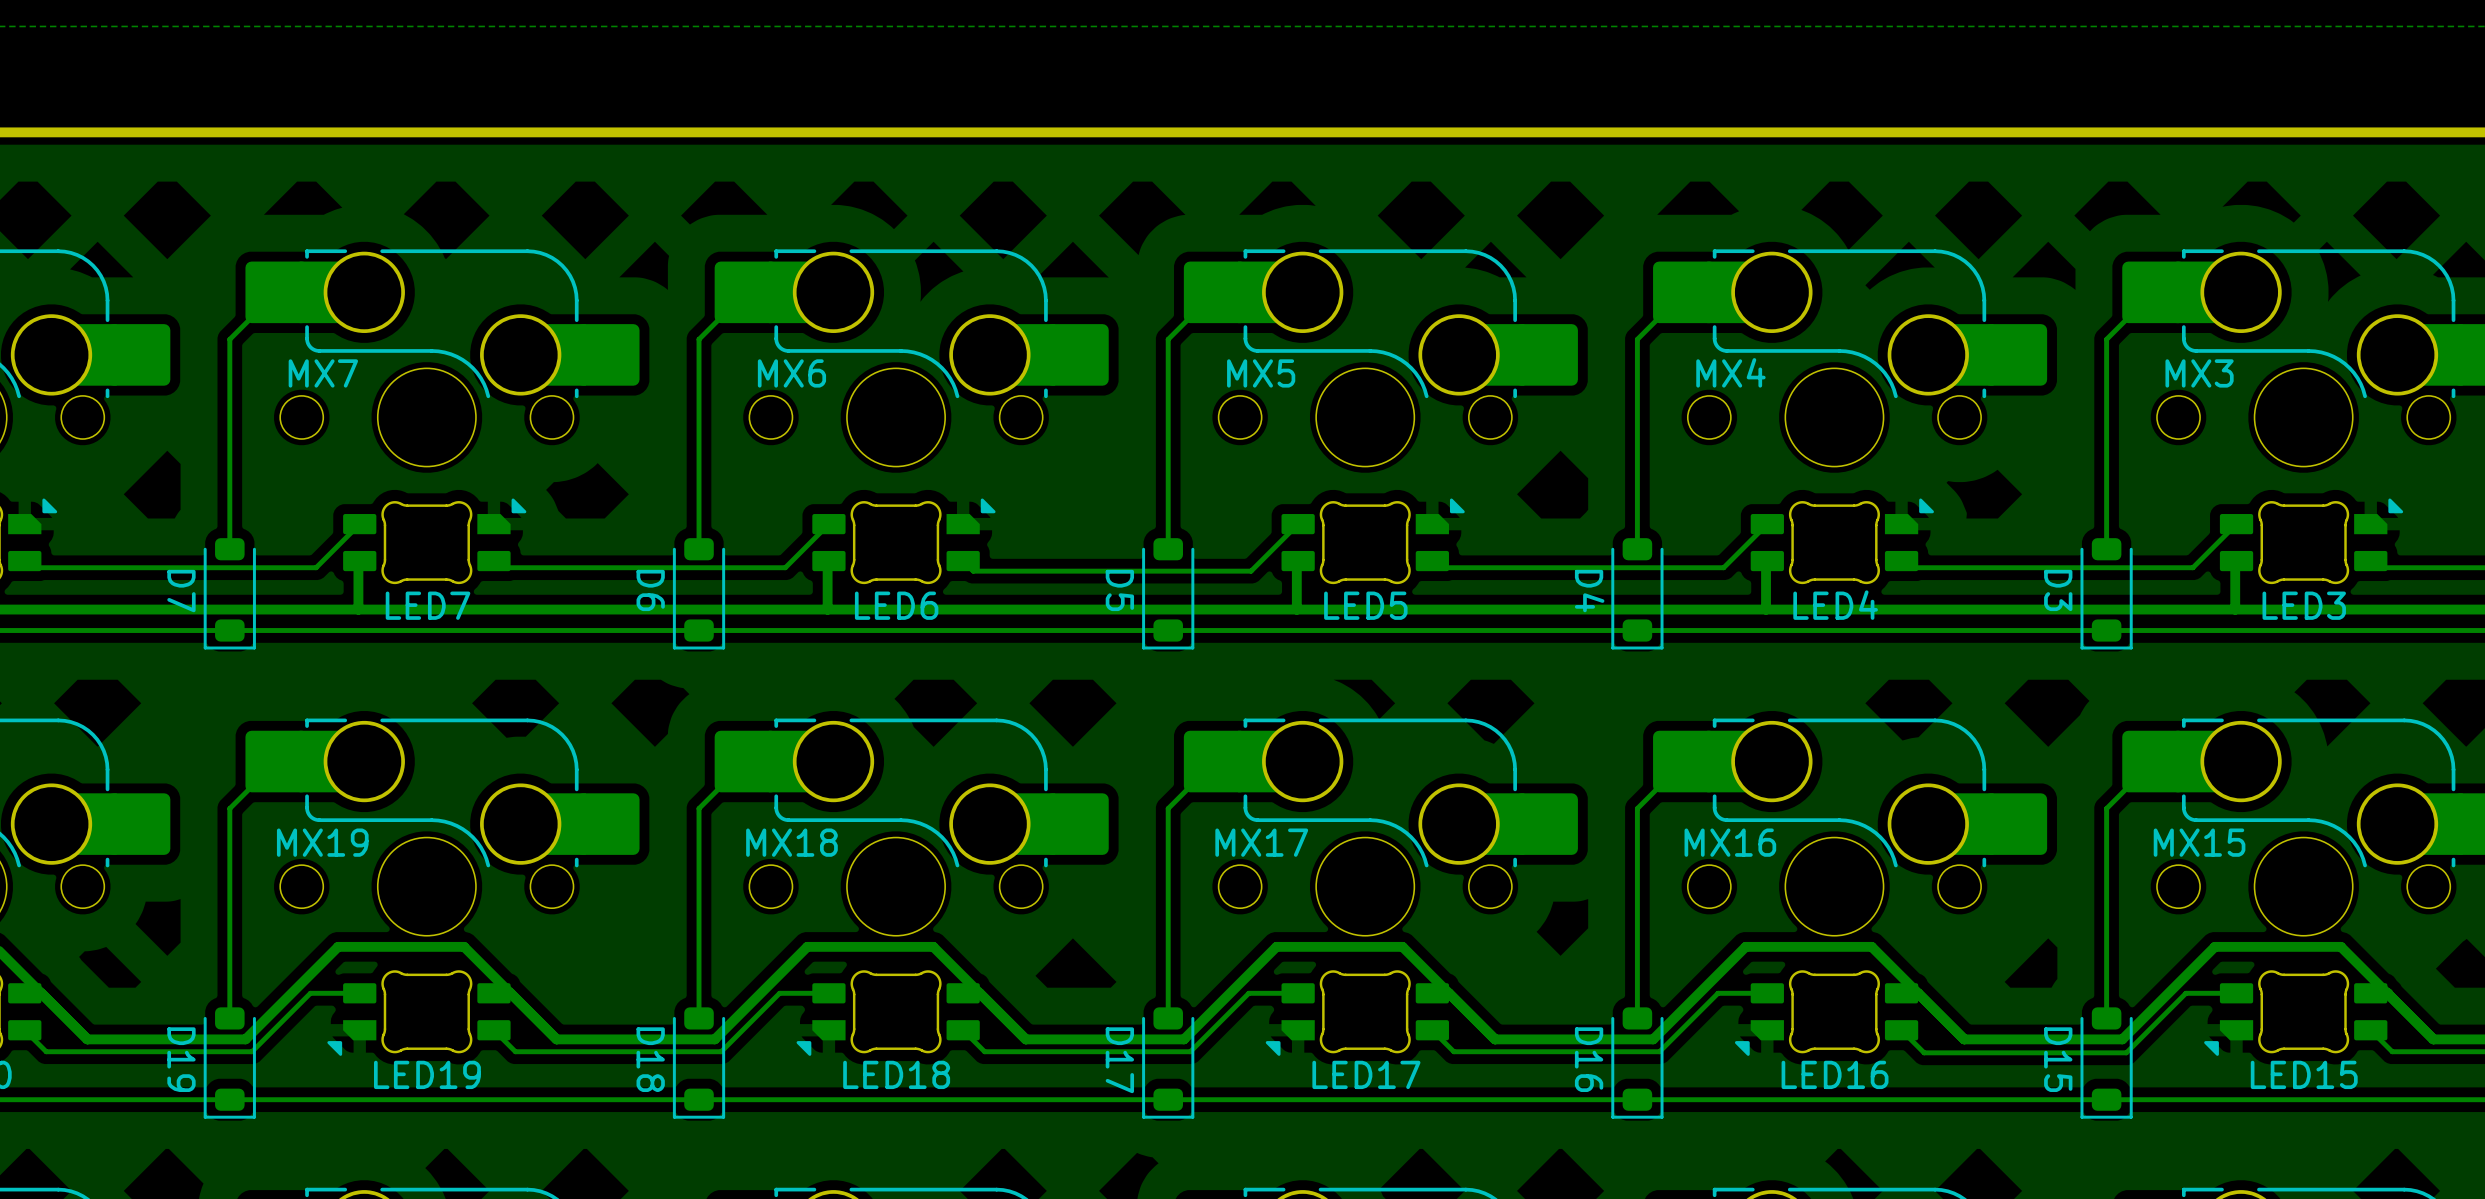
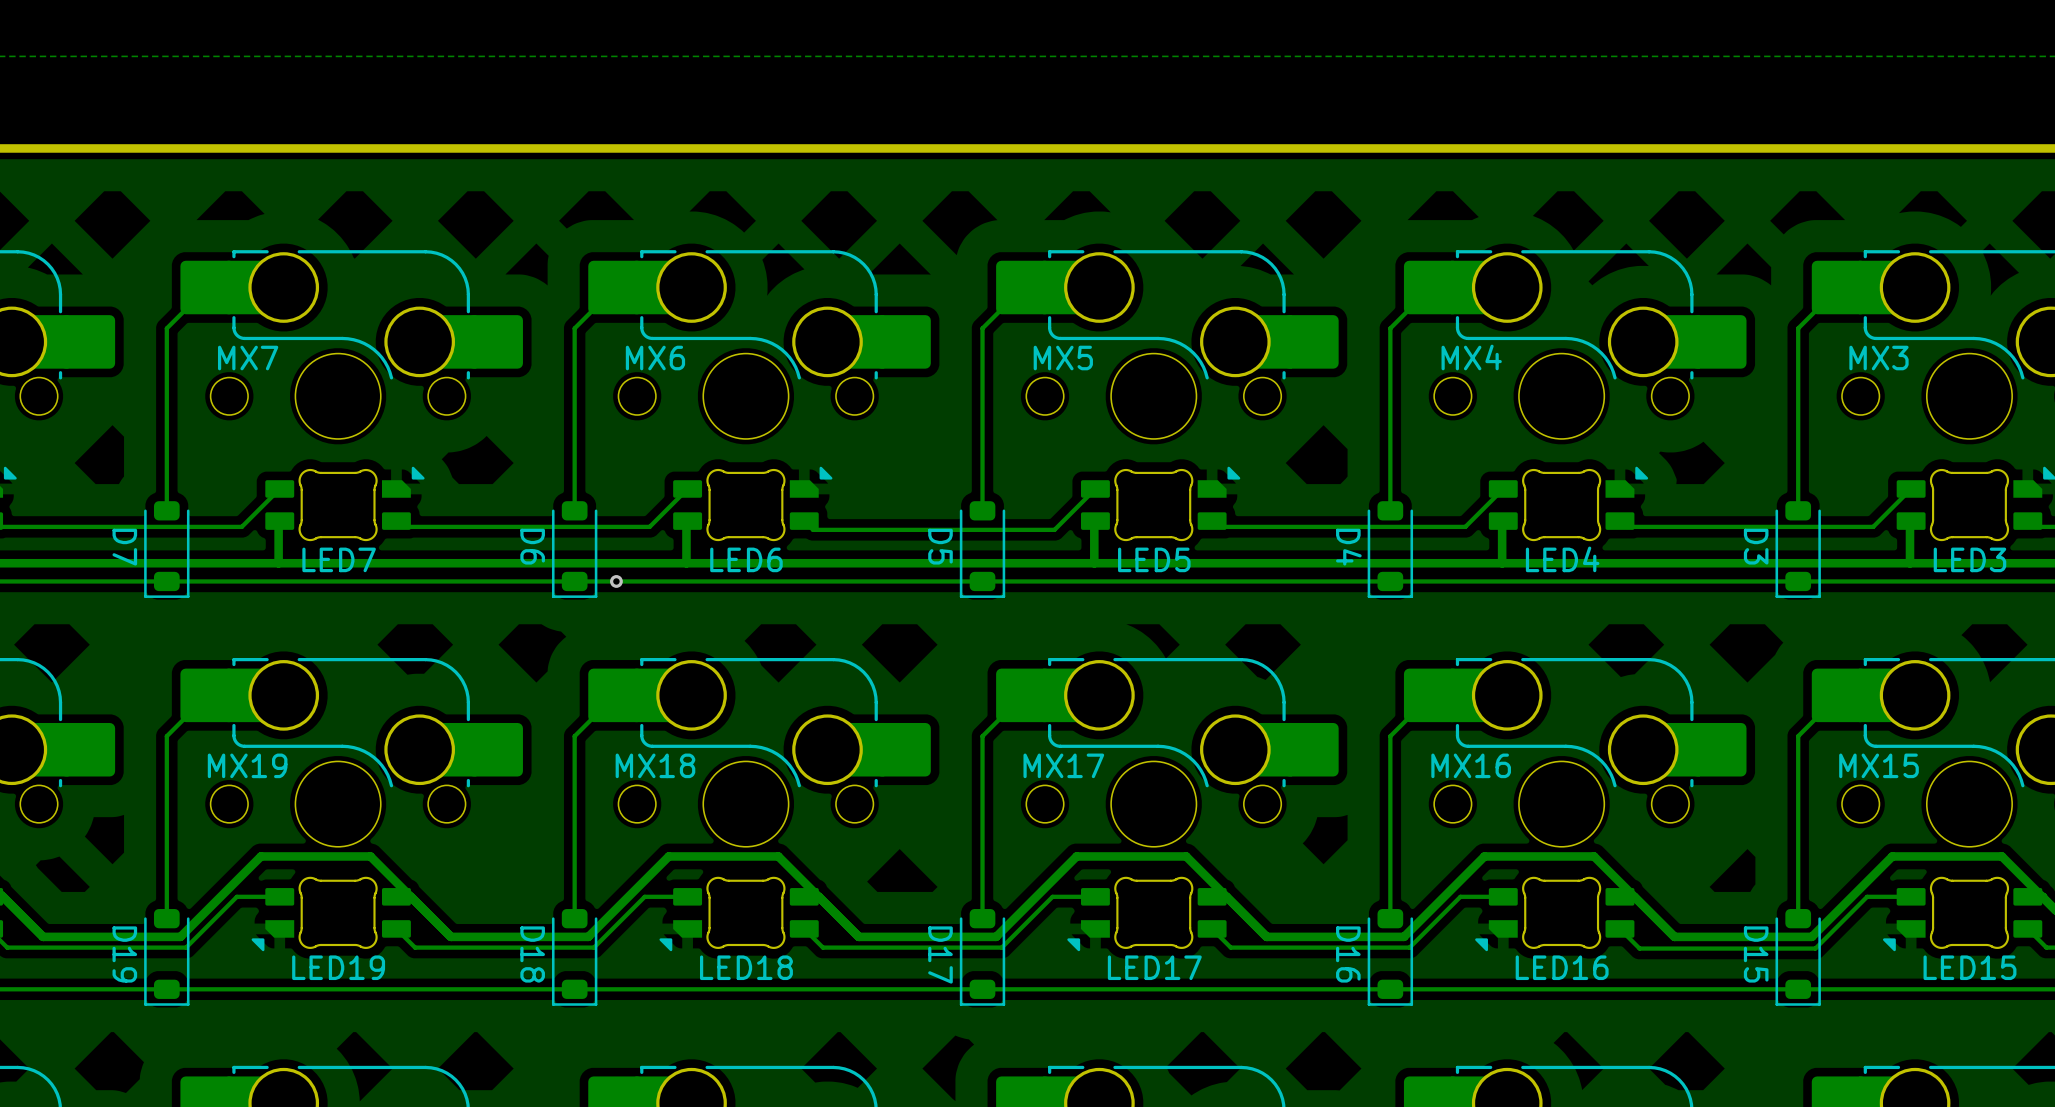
via: none -> (616, 581)

